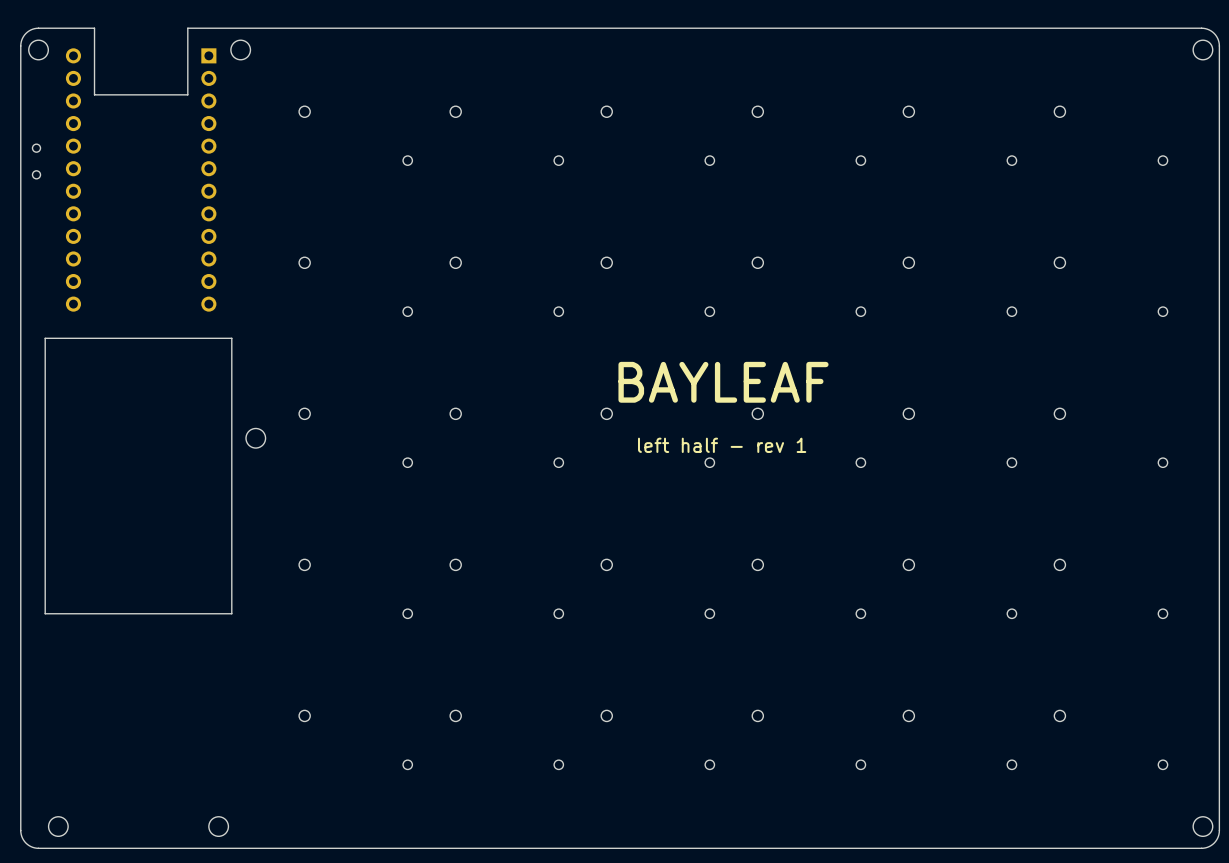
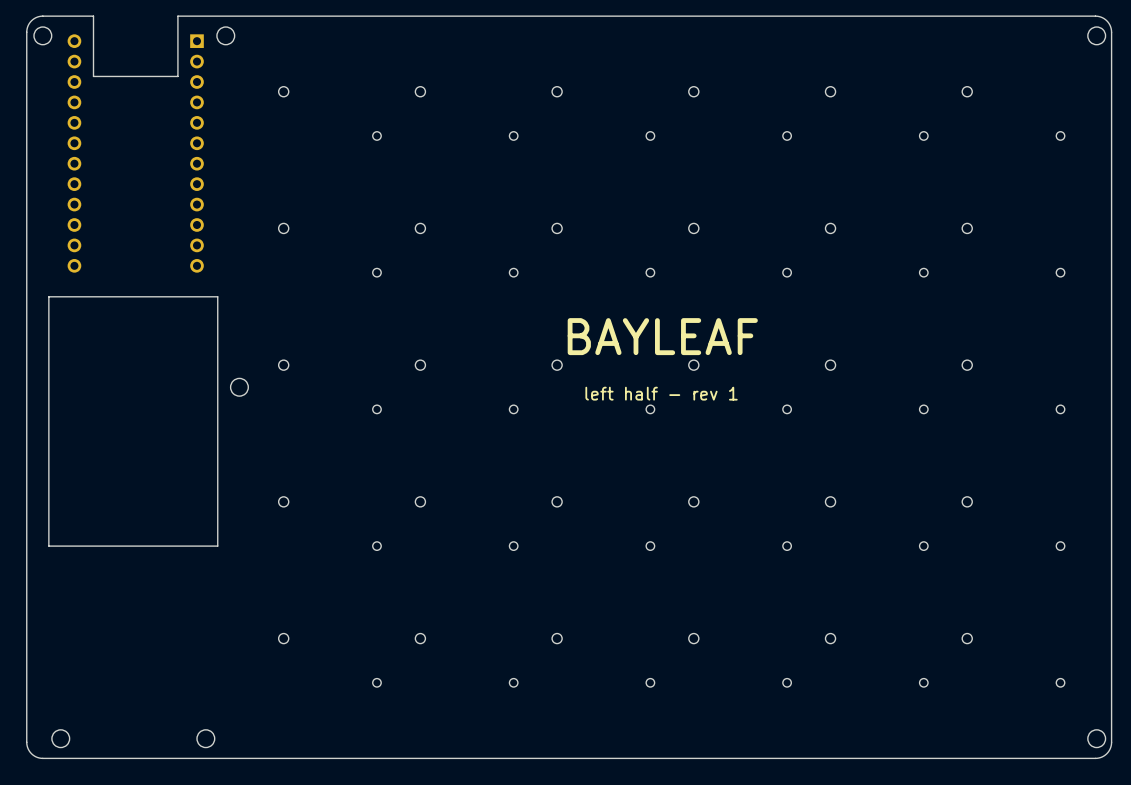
part: (36, 161) -> none

